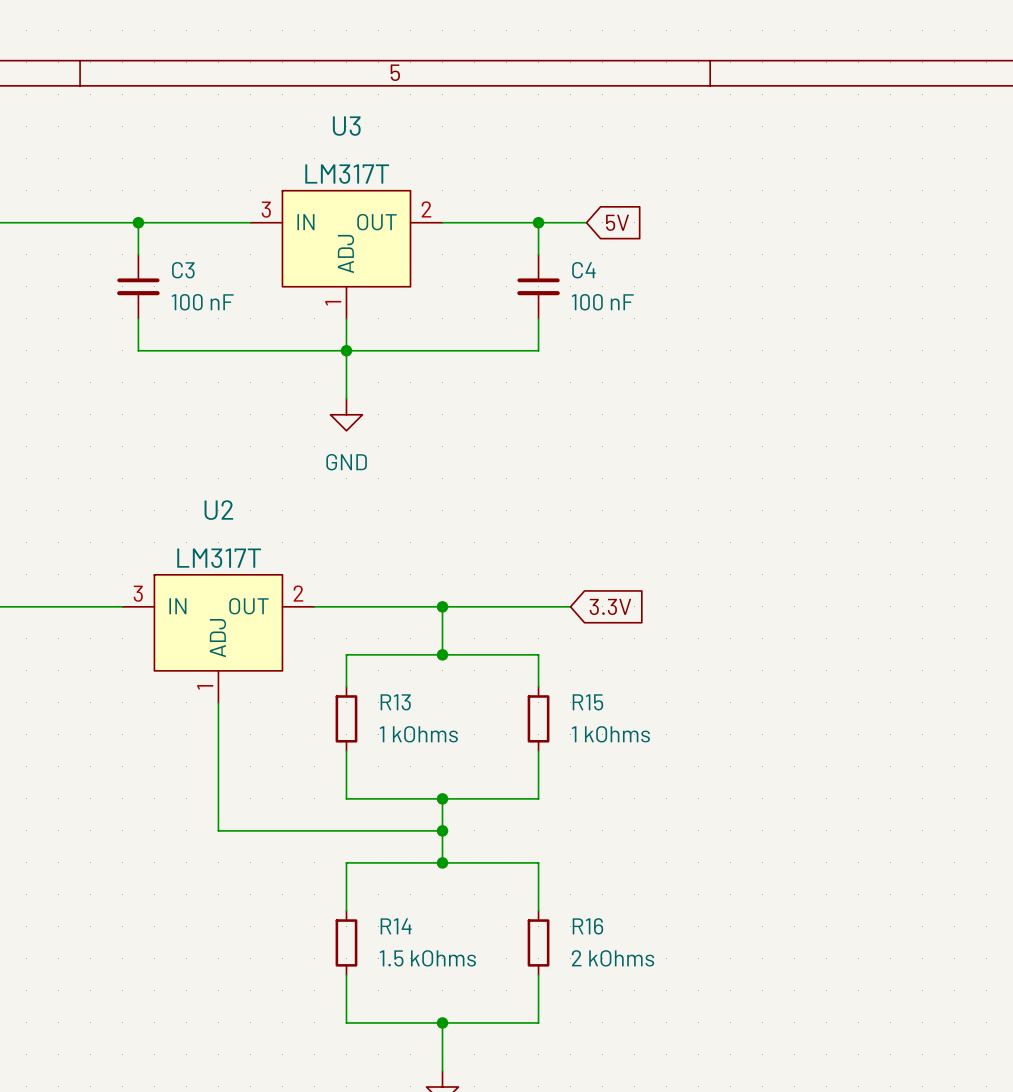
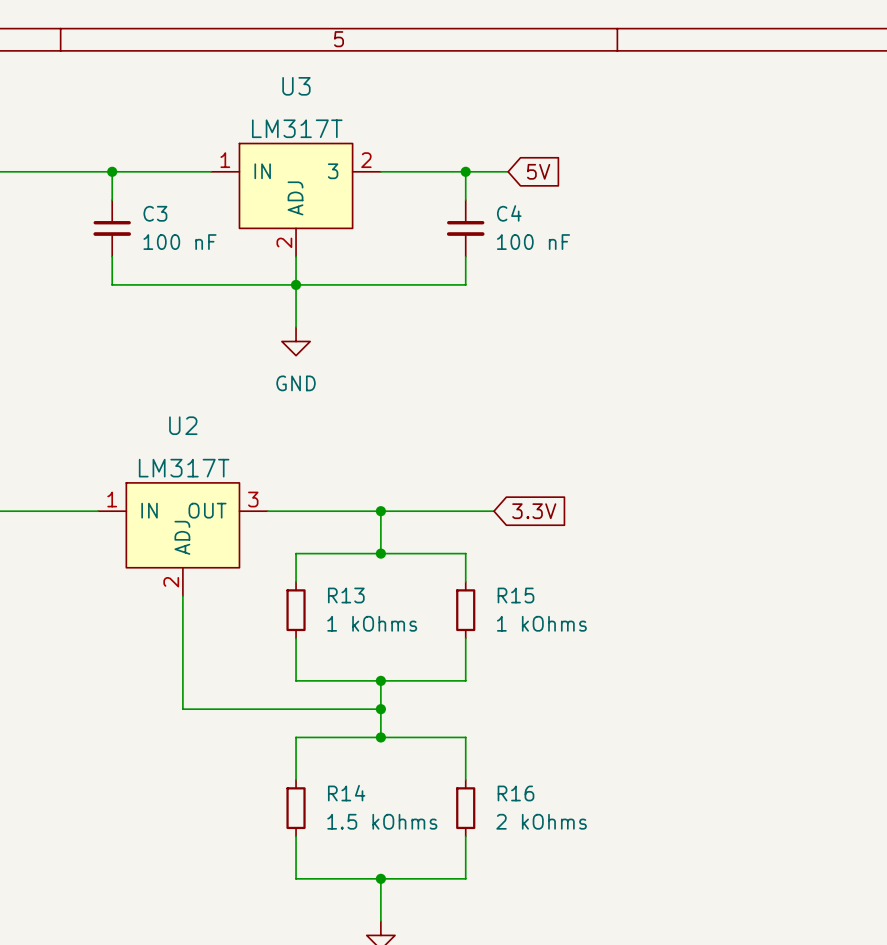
U3 pin number: 3 (266, 209) -> 1 (225, 160)
U3 pin name: OUT (377, 222) -> 3 (333, 171)
U3 pin number: 1 (333, 303) -> 2 (284, 242)
U2 pin number: 3 (138, 593) -> 1 (112, 499)
U2 pin number: 2 (298, 593) -> 3 (253, 499)
U2 pin number: 1 (205, 687) -> 2 (171, 582)

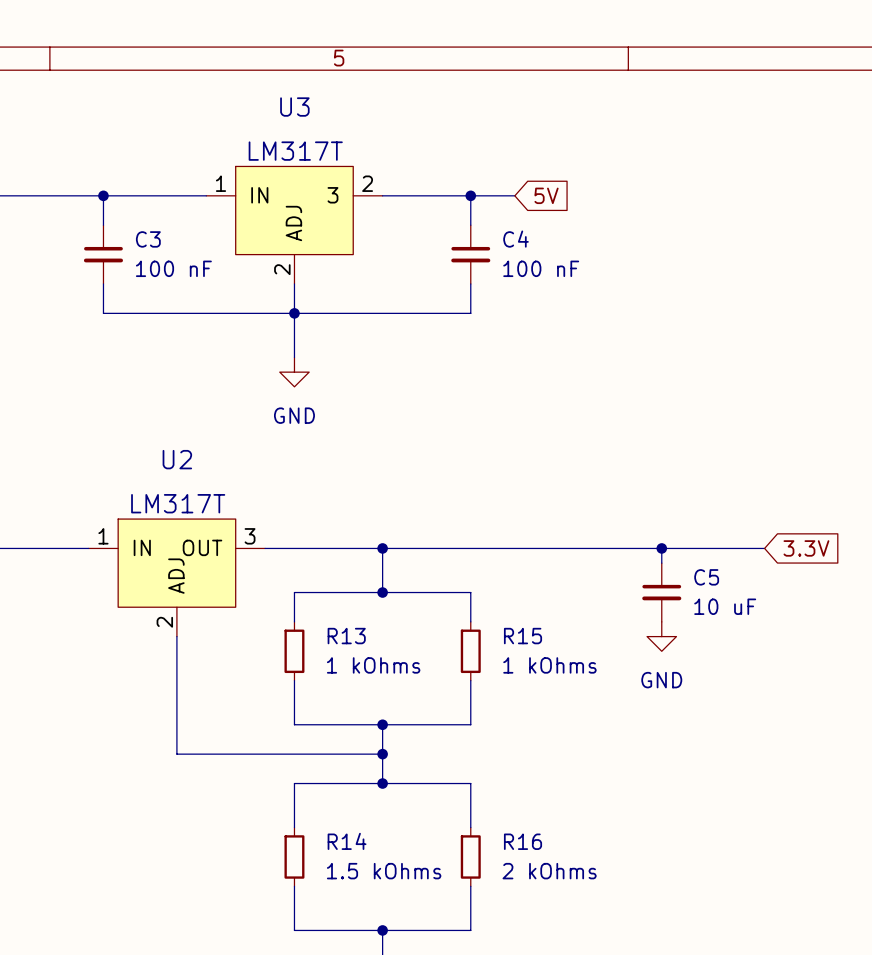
wire: none -> (500, 548) (764, 548)
global label position: 3.3V (534, 511) -> 3.3V (806, 548)
wire: none -> (661, 548) (661, 563)
junction: none -> (661, 548)
C5: none -> 10 uF (661, 592)
power symbol: none -> GND (661, 636)

